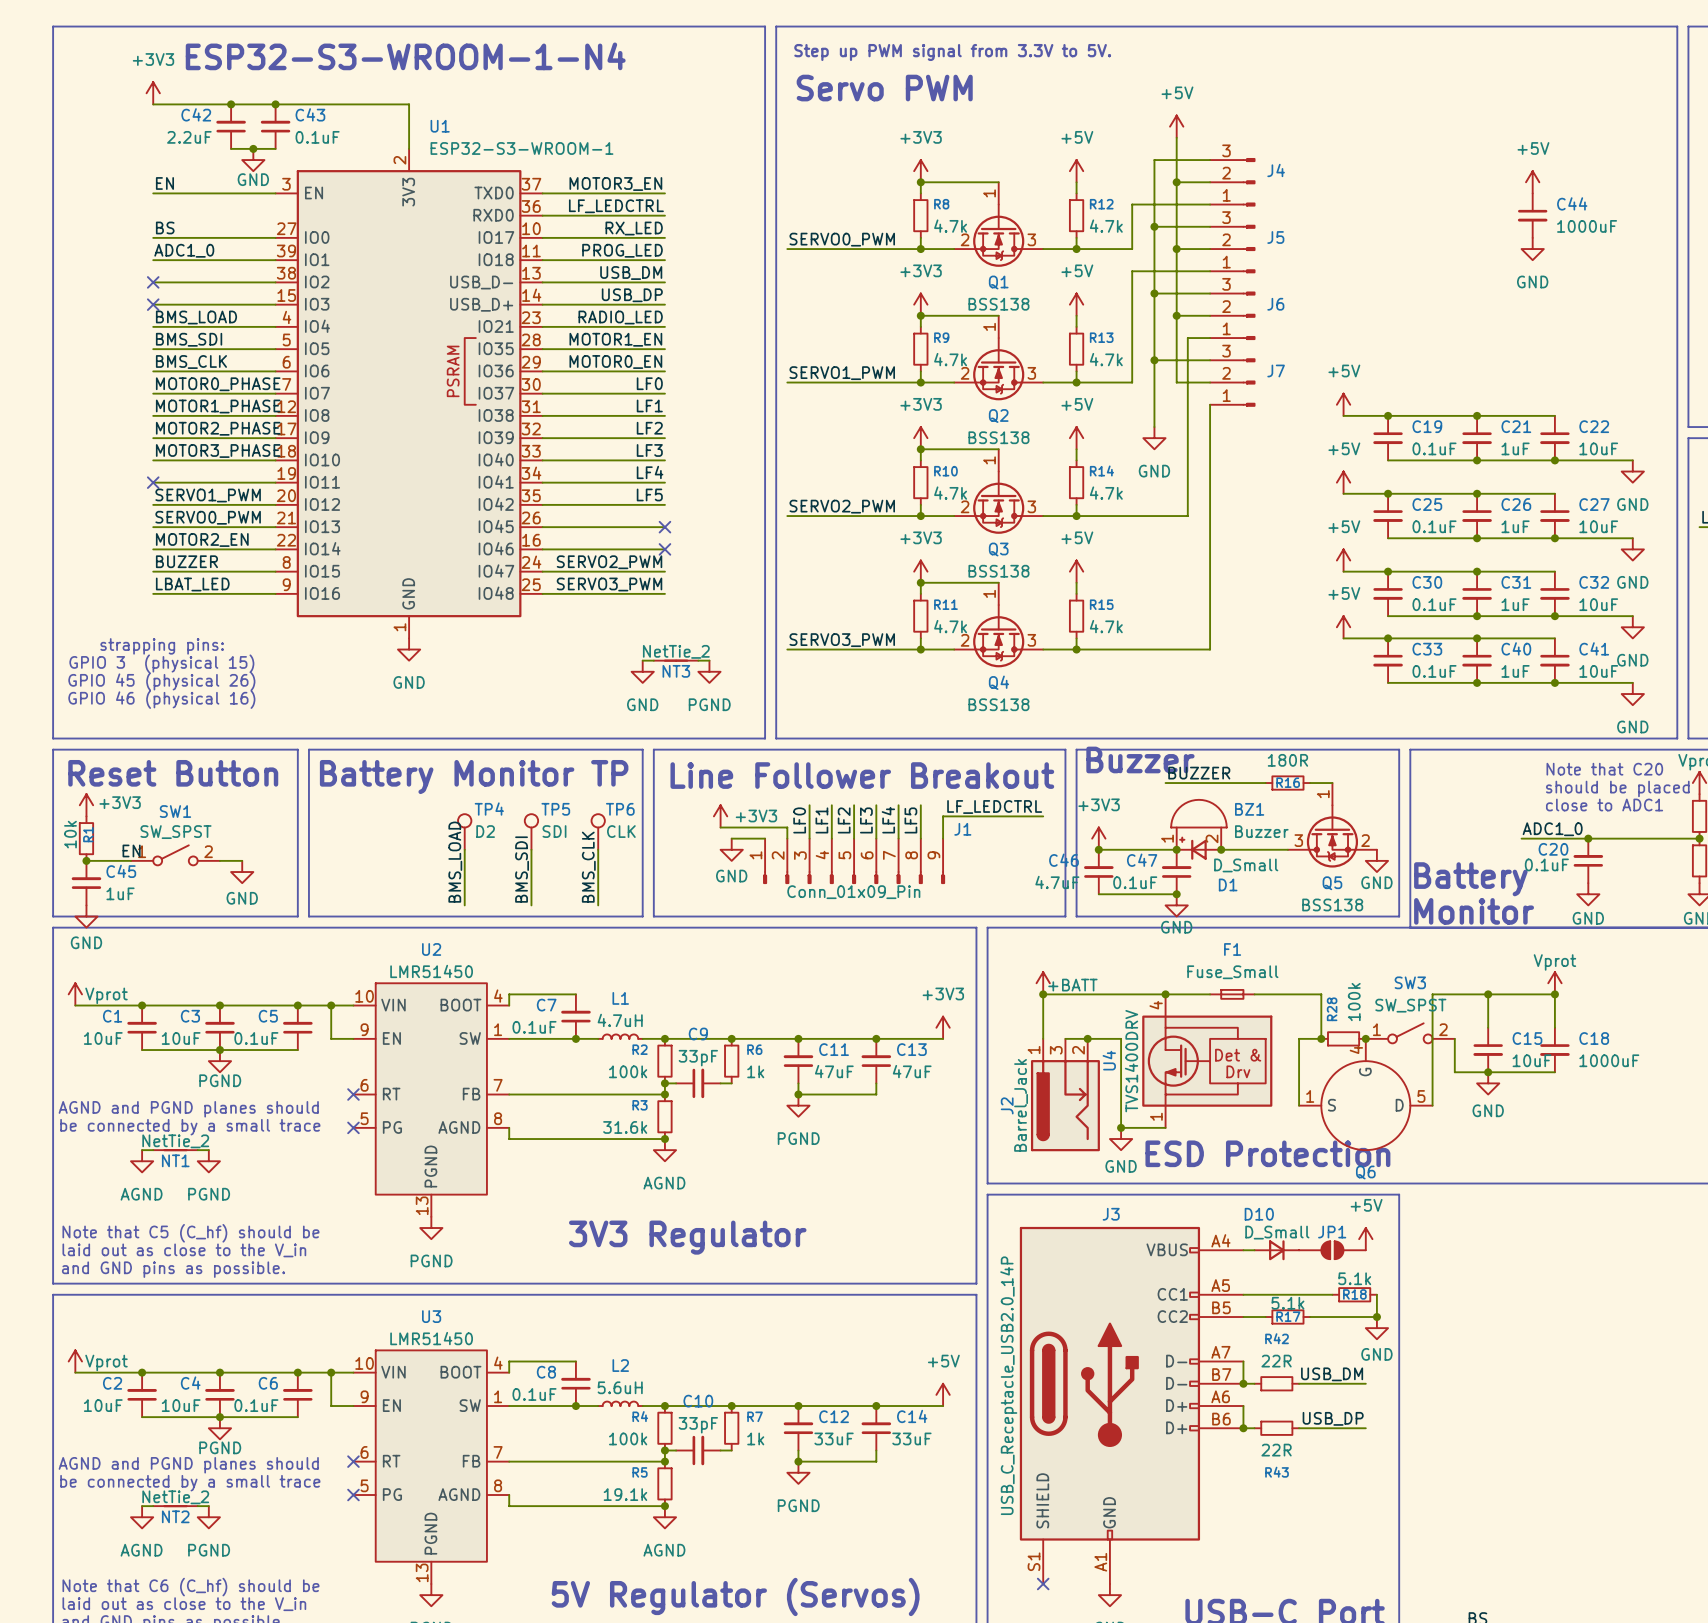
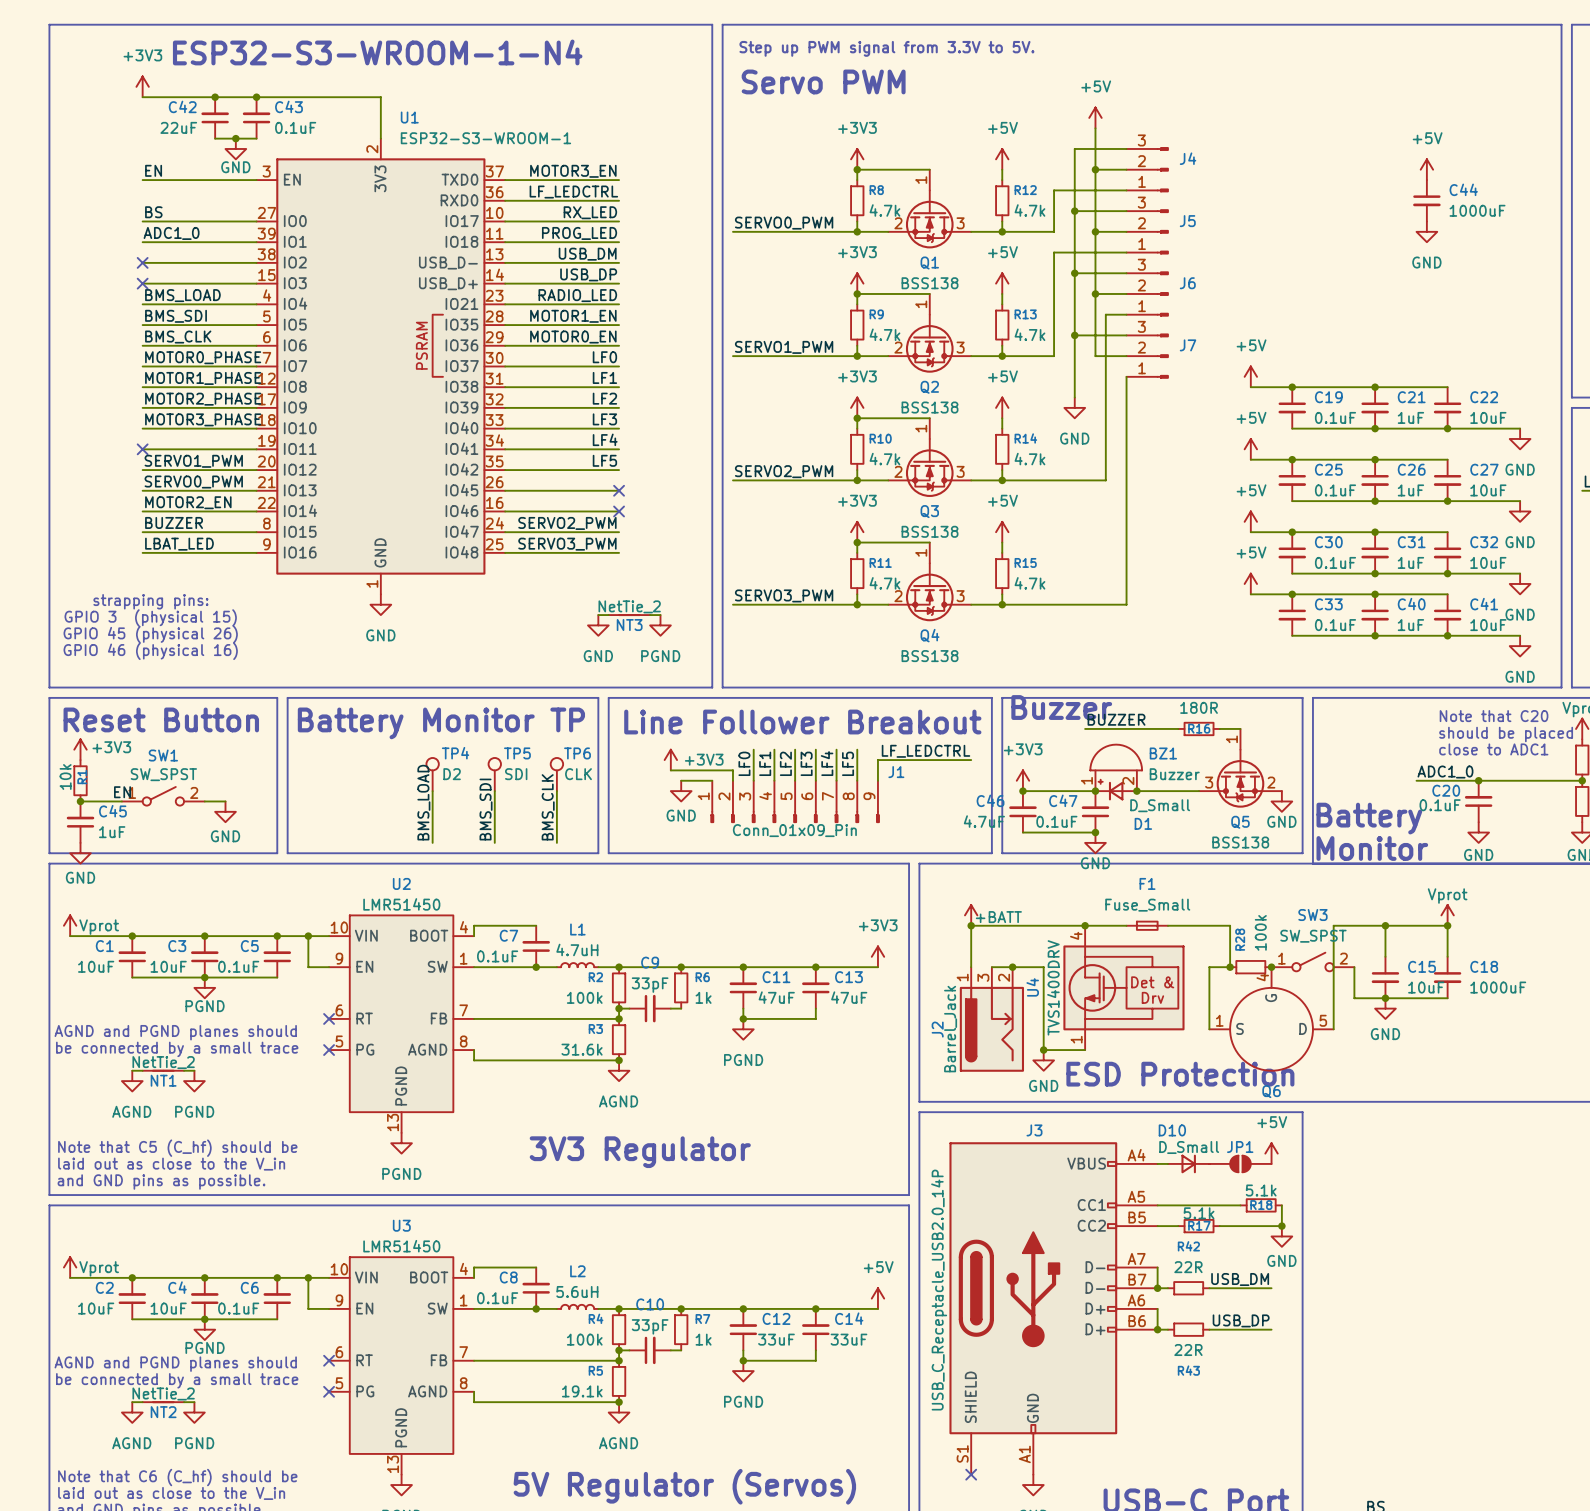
C42 value: 2.2uF (189, 137) -> 22uF (178, 127)

